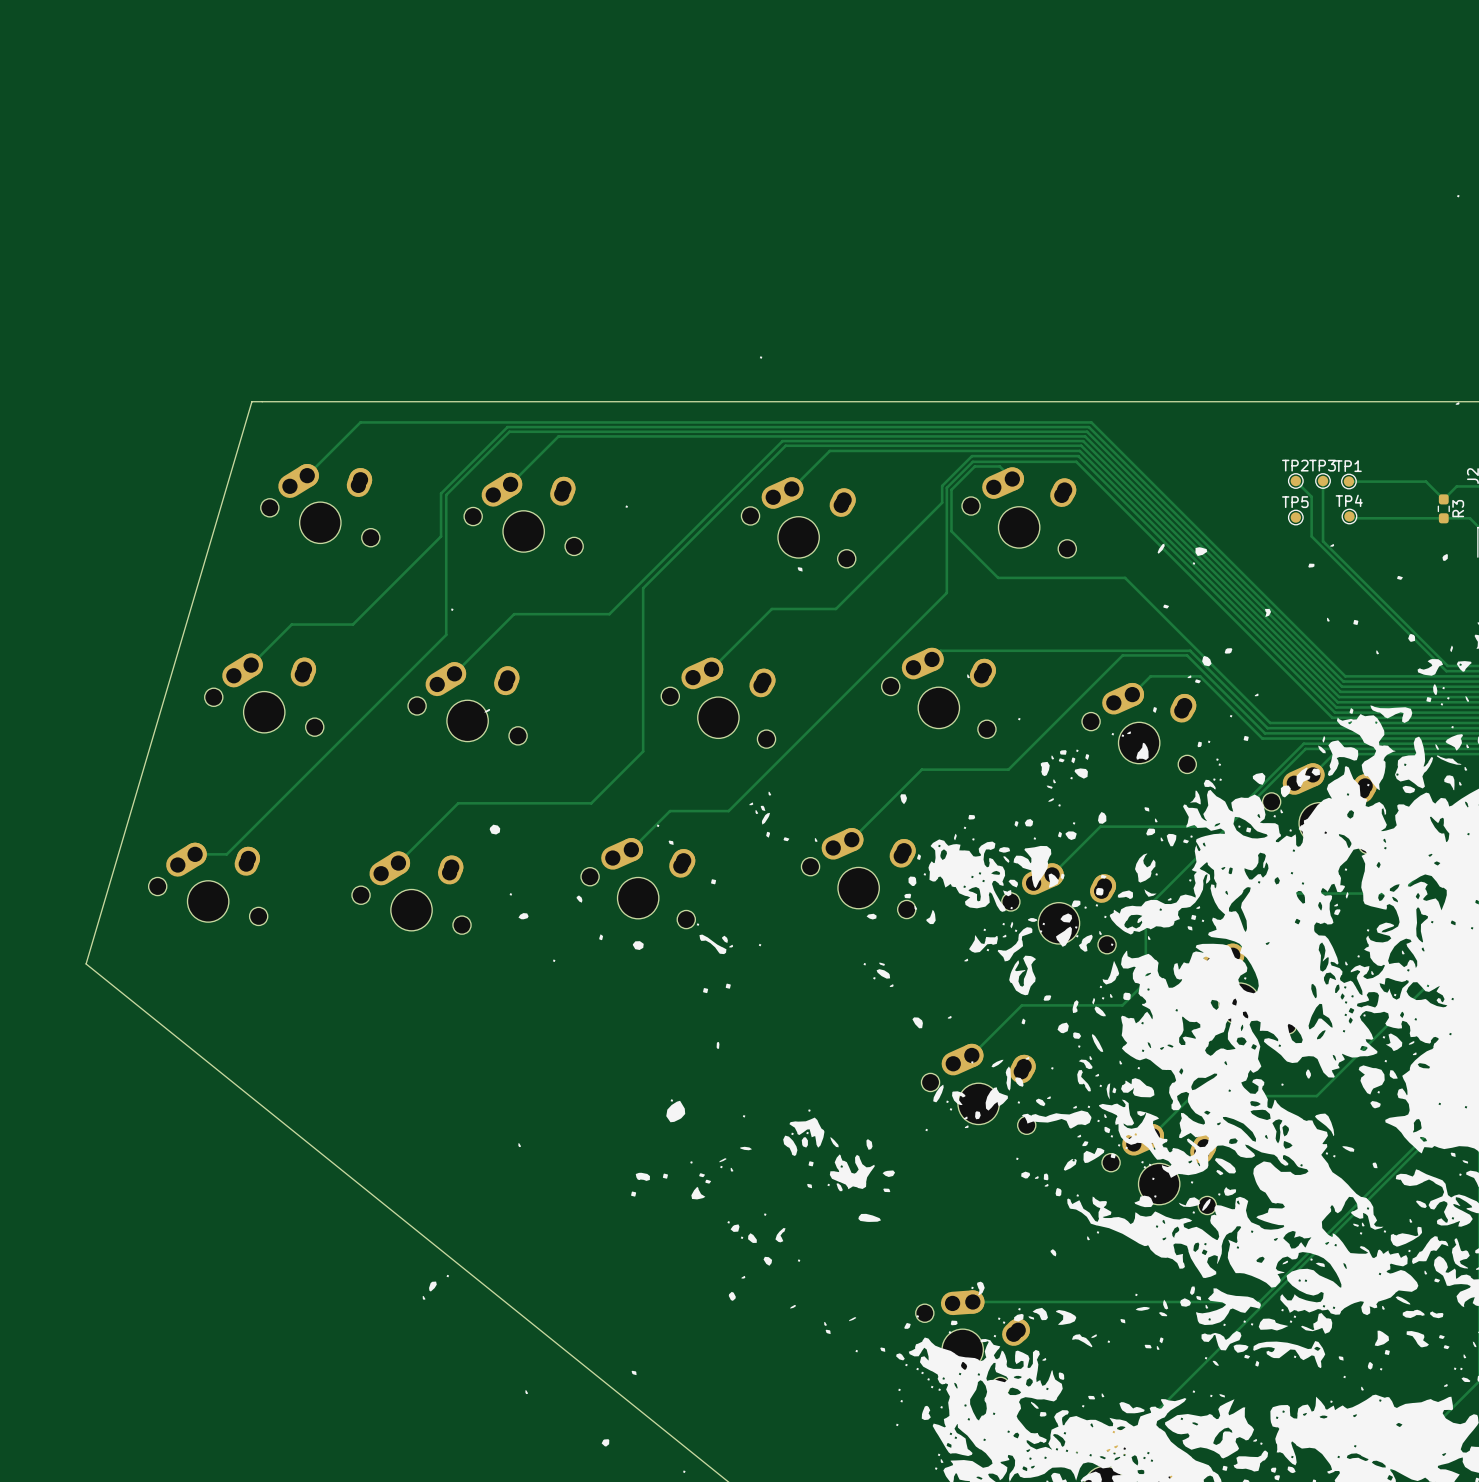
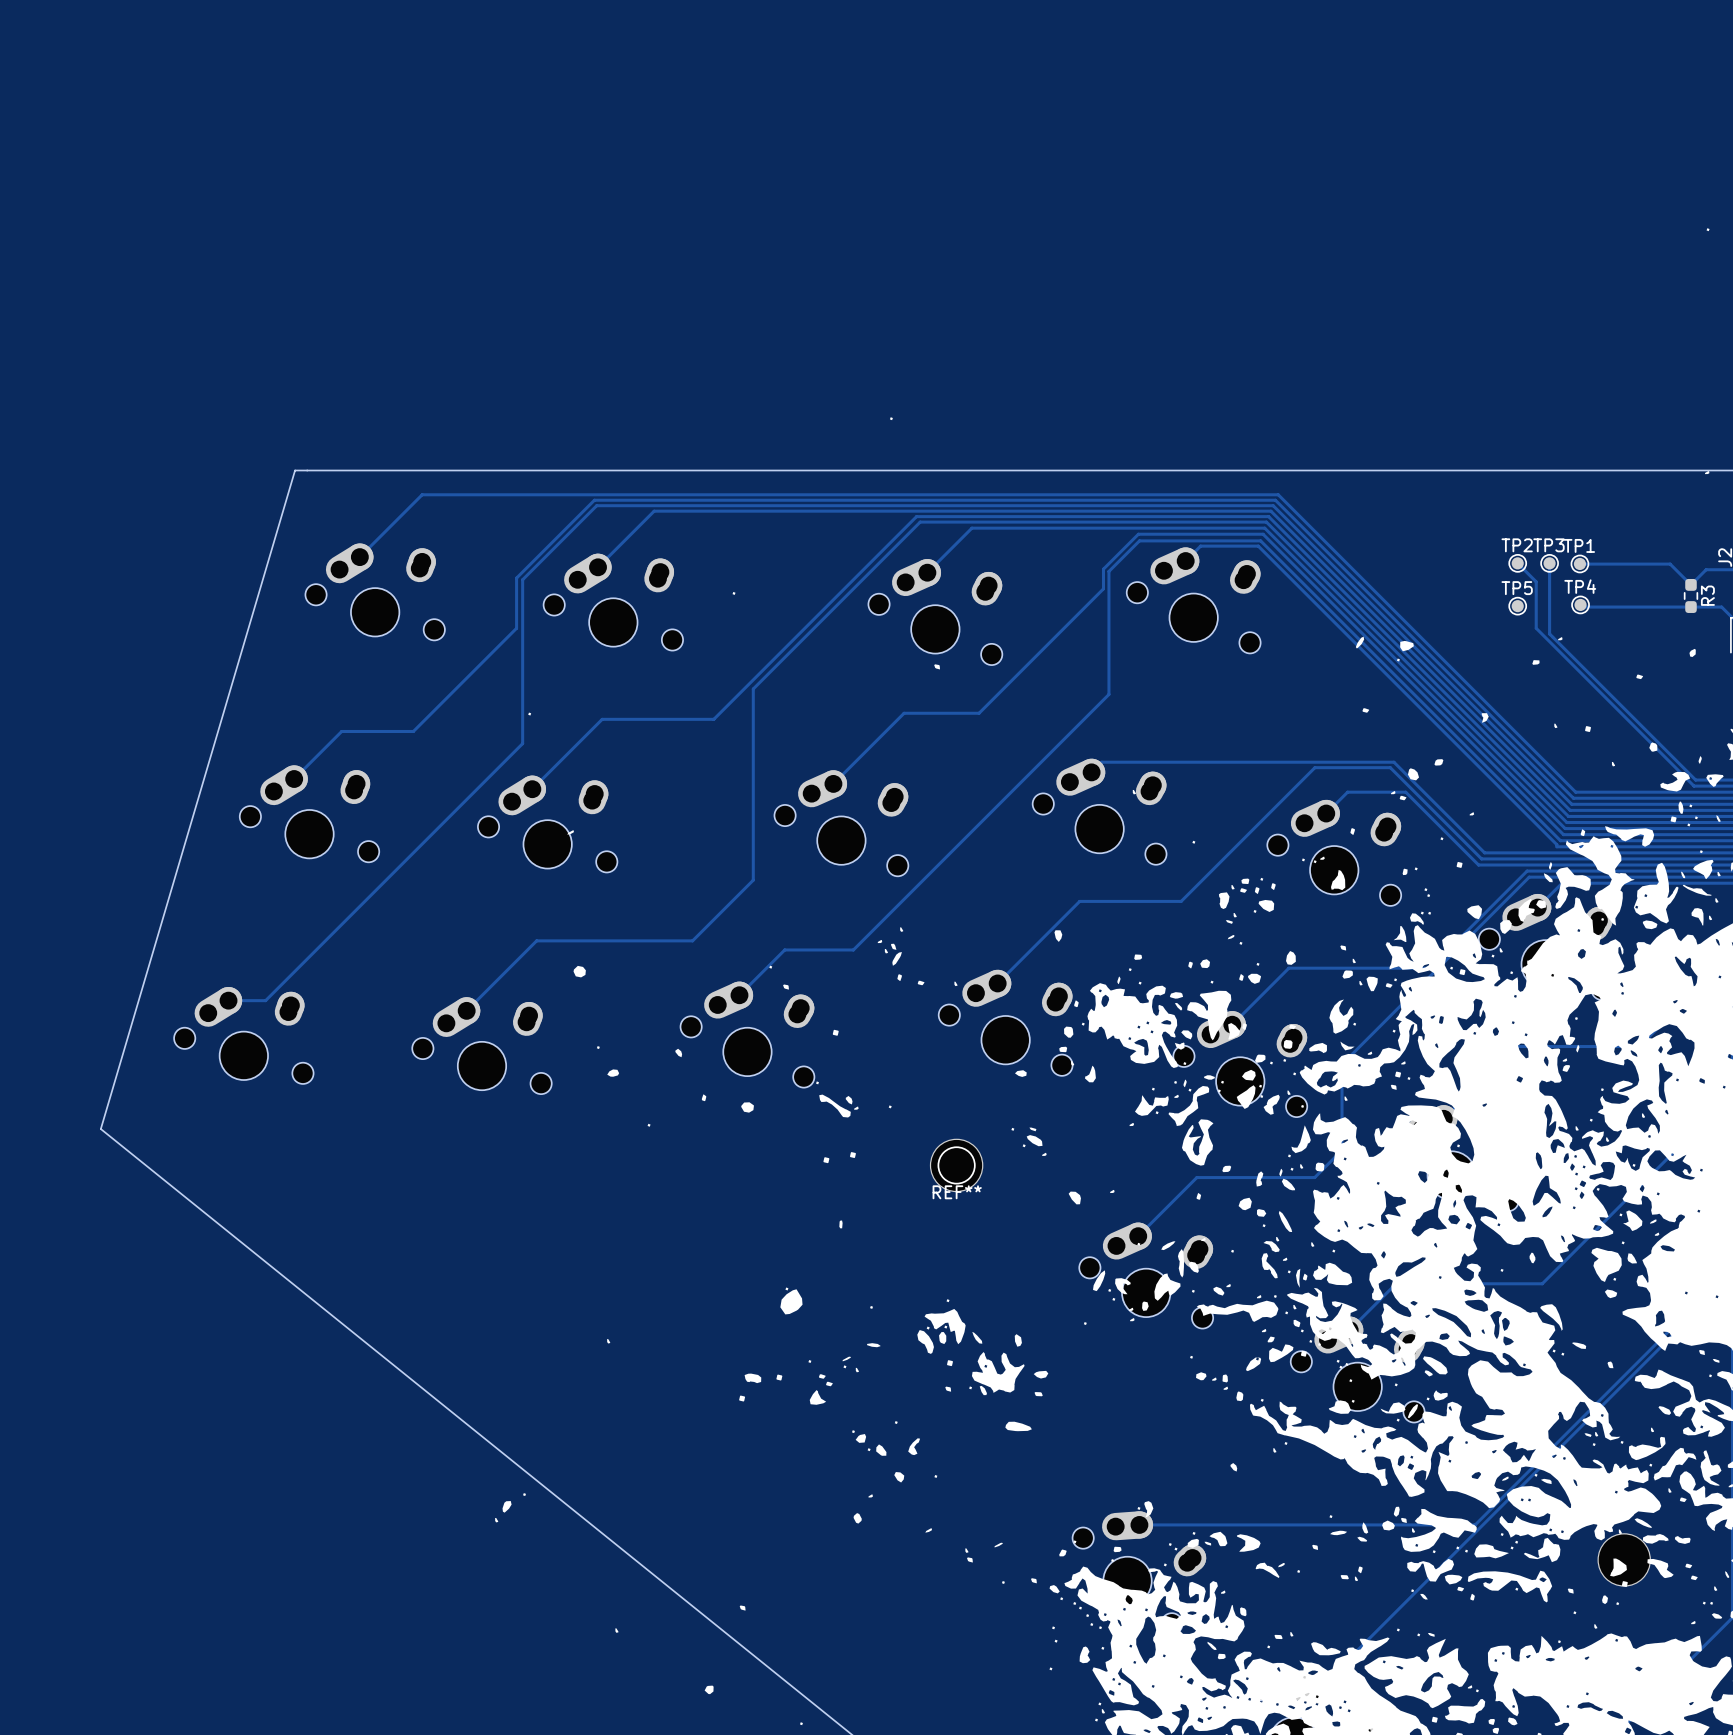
track: (1012, 479) (999, 466) (974, 466) (951, 489) (951, 531) (998, 577) (1125, 577) (1270, 723) (1329, 723) -> (1185, 561) (1200, 546) (1258, 546) (1556, 846)
REF**: none -> (956, 1165)
part: none -> (1624, 1559)

